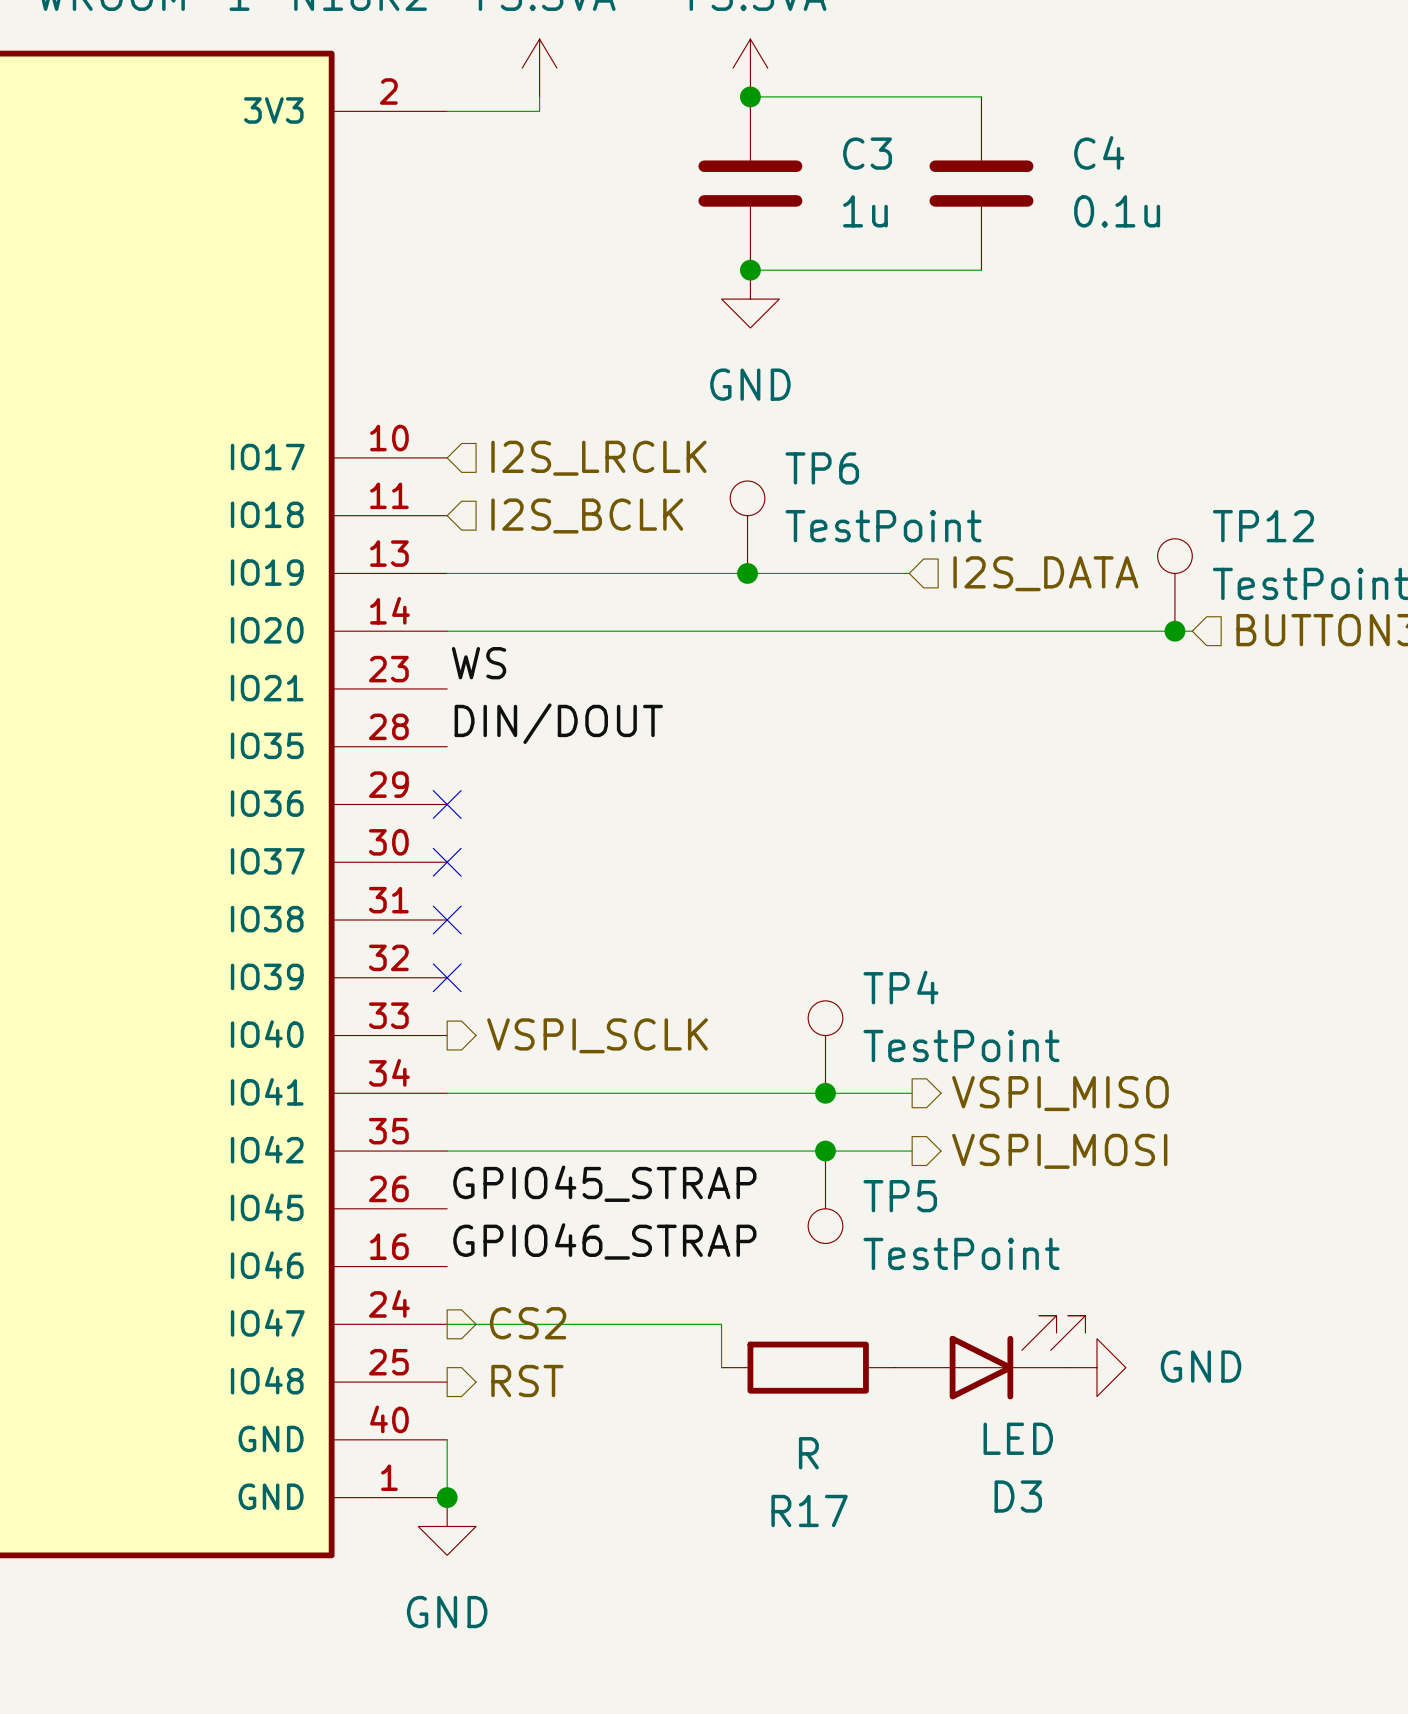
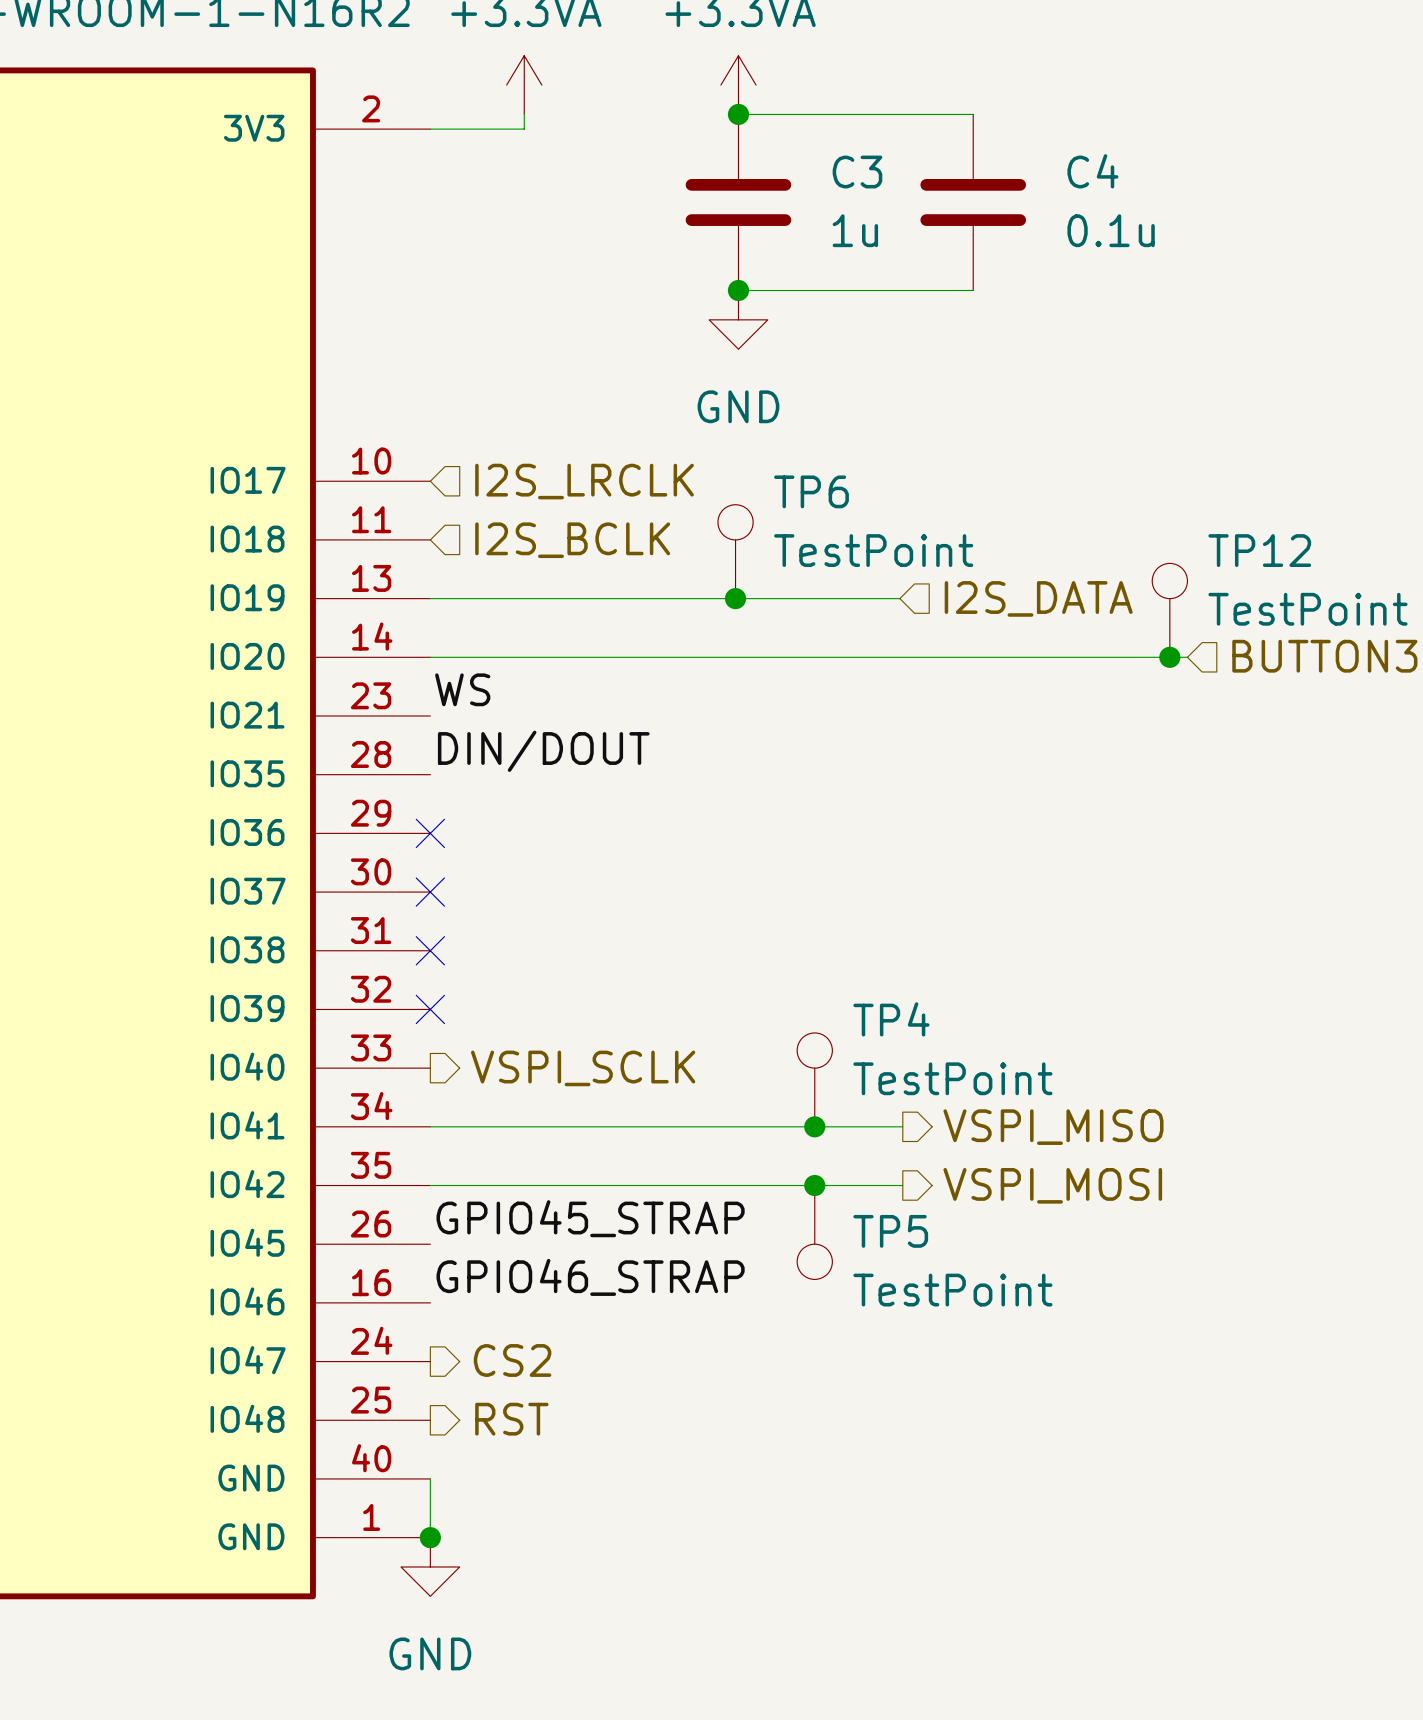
wire: (447, 1324) (721, 1324) (721, 1367) -> none
D3: LED (990, 1357) -> none
R17: R (808, 1367) -> none
power symbol: GND (1096, 1367) -> none

